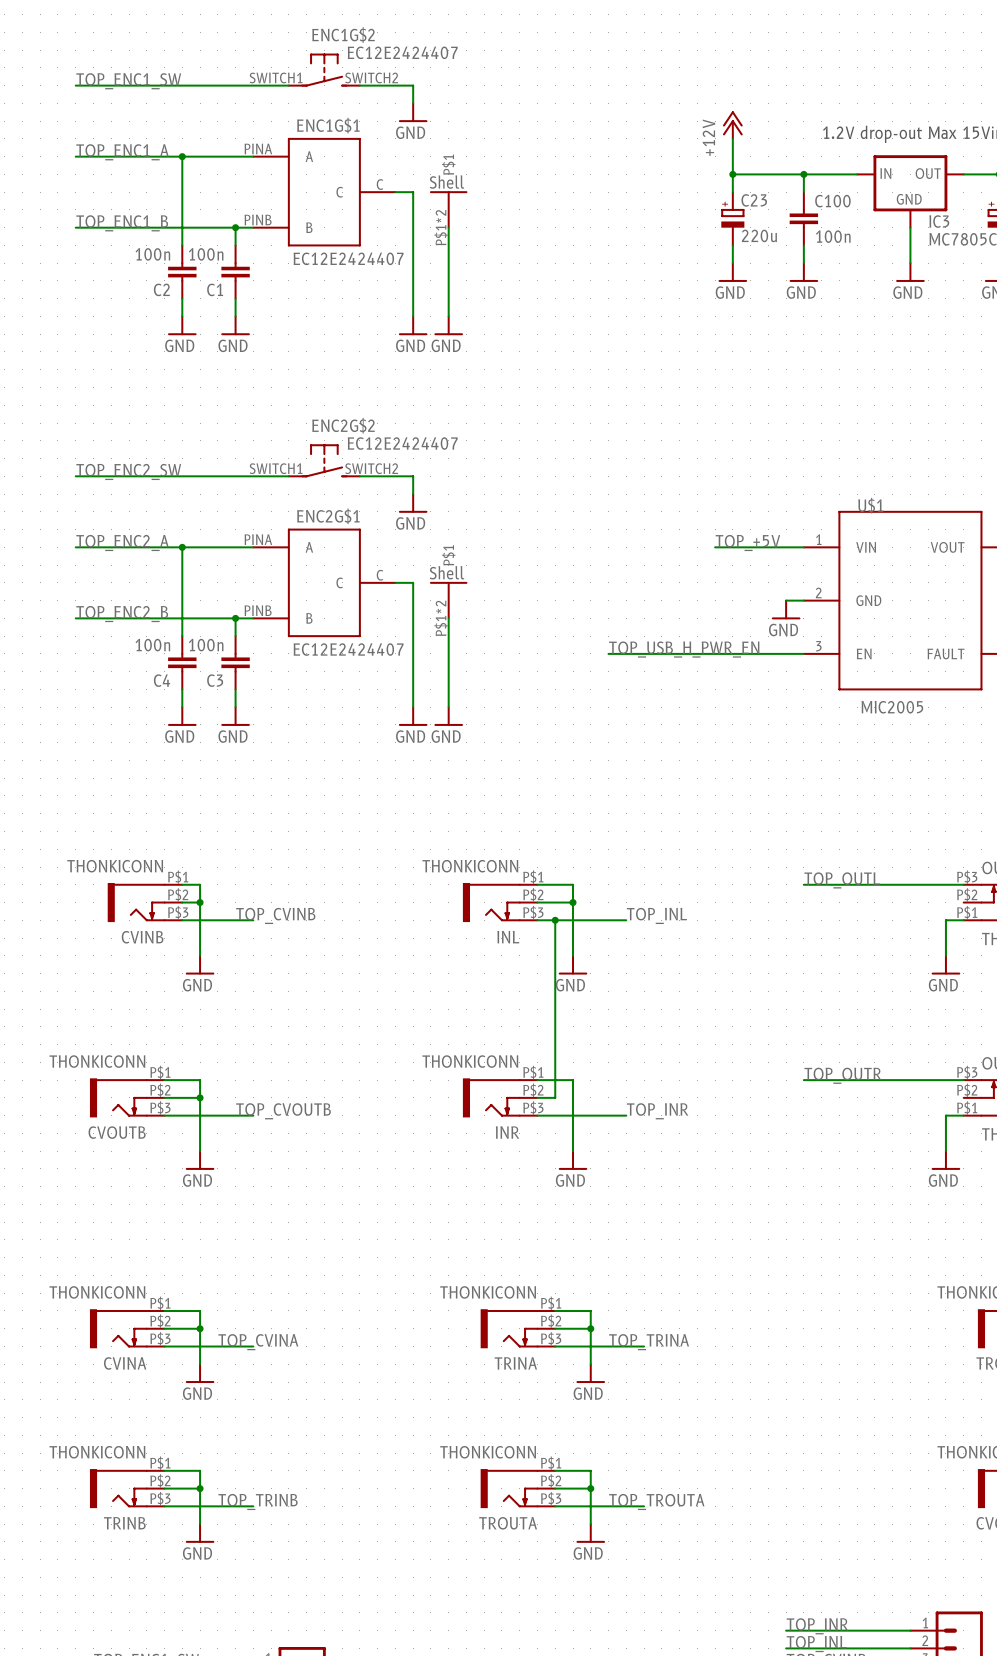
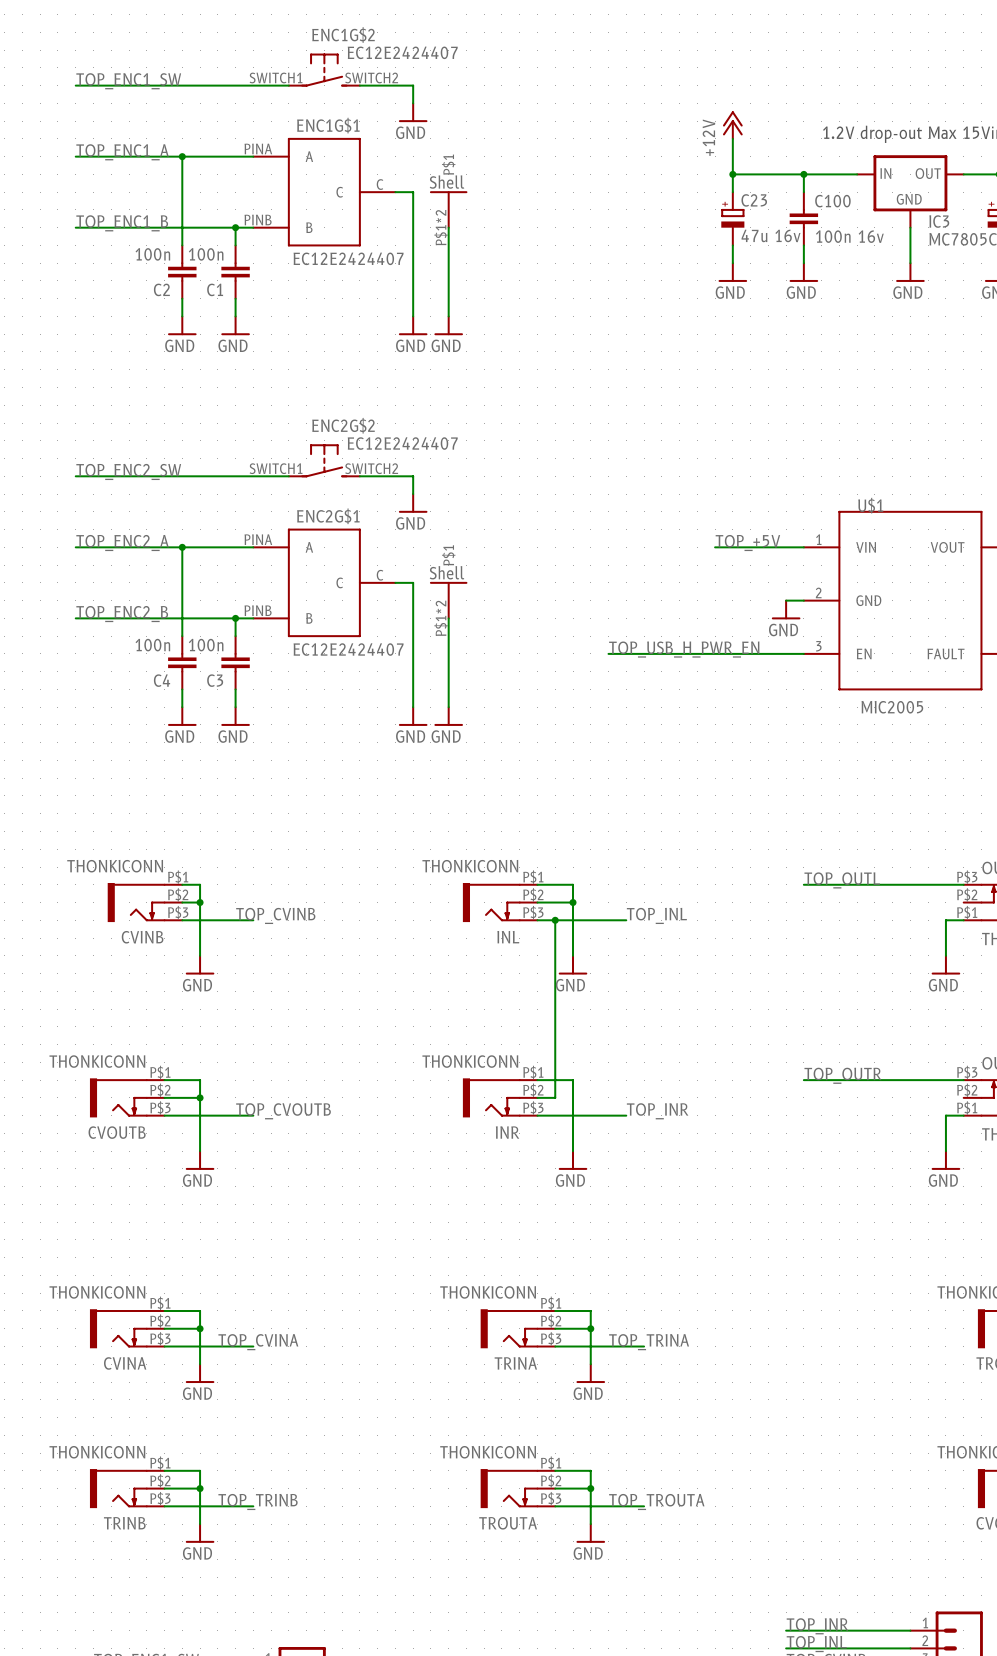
C23 value: 220u (759, 235) -> 47u 16v (771, 235)
C100 value: 100n (833, 236) -> 100n 16v (849, 236)

